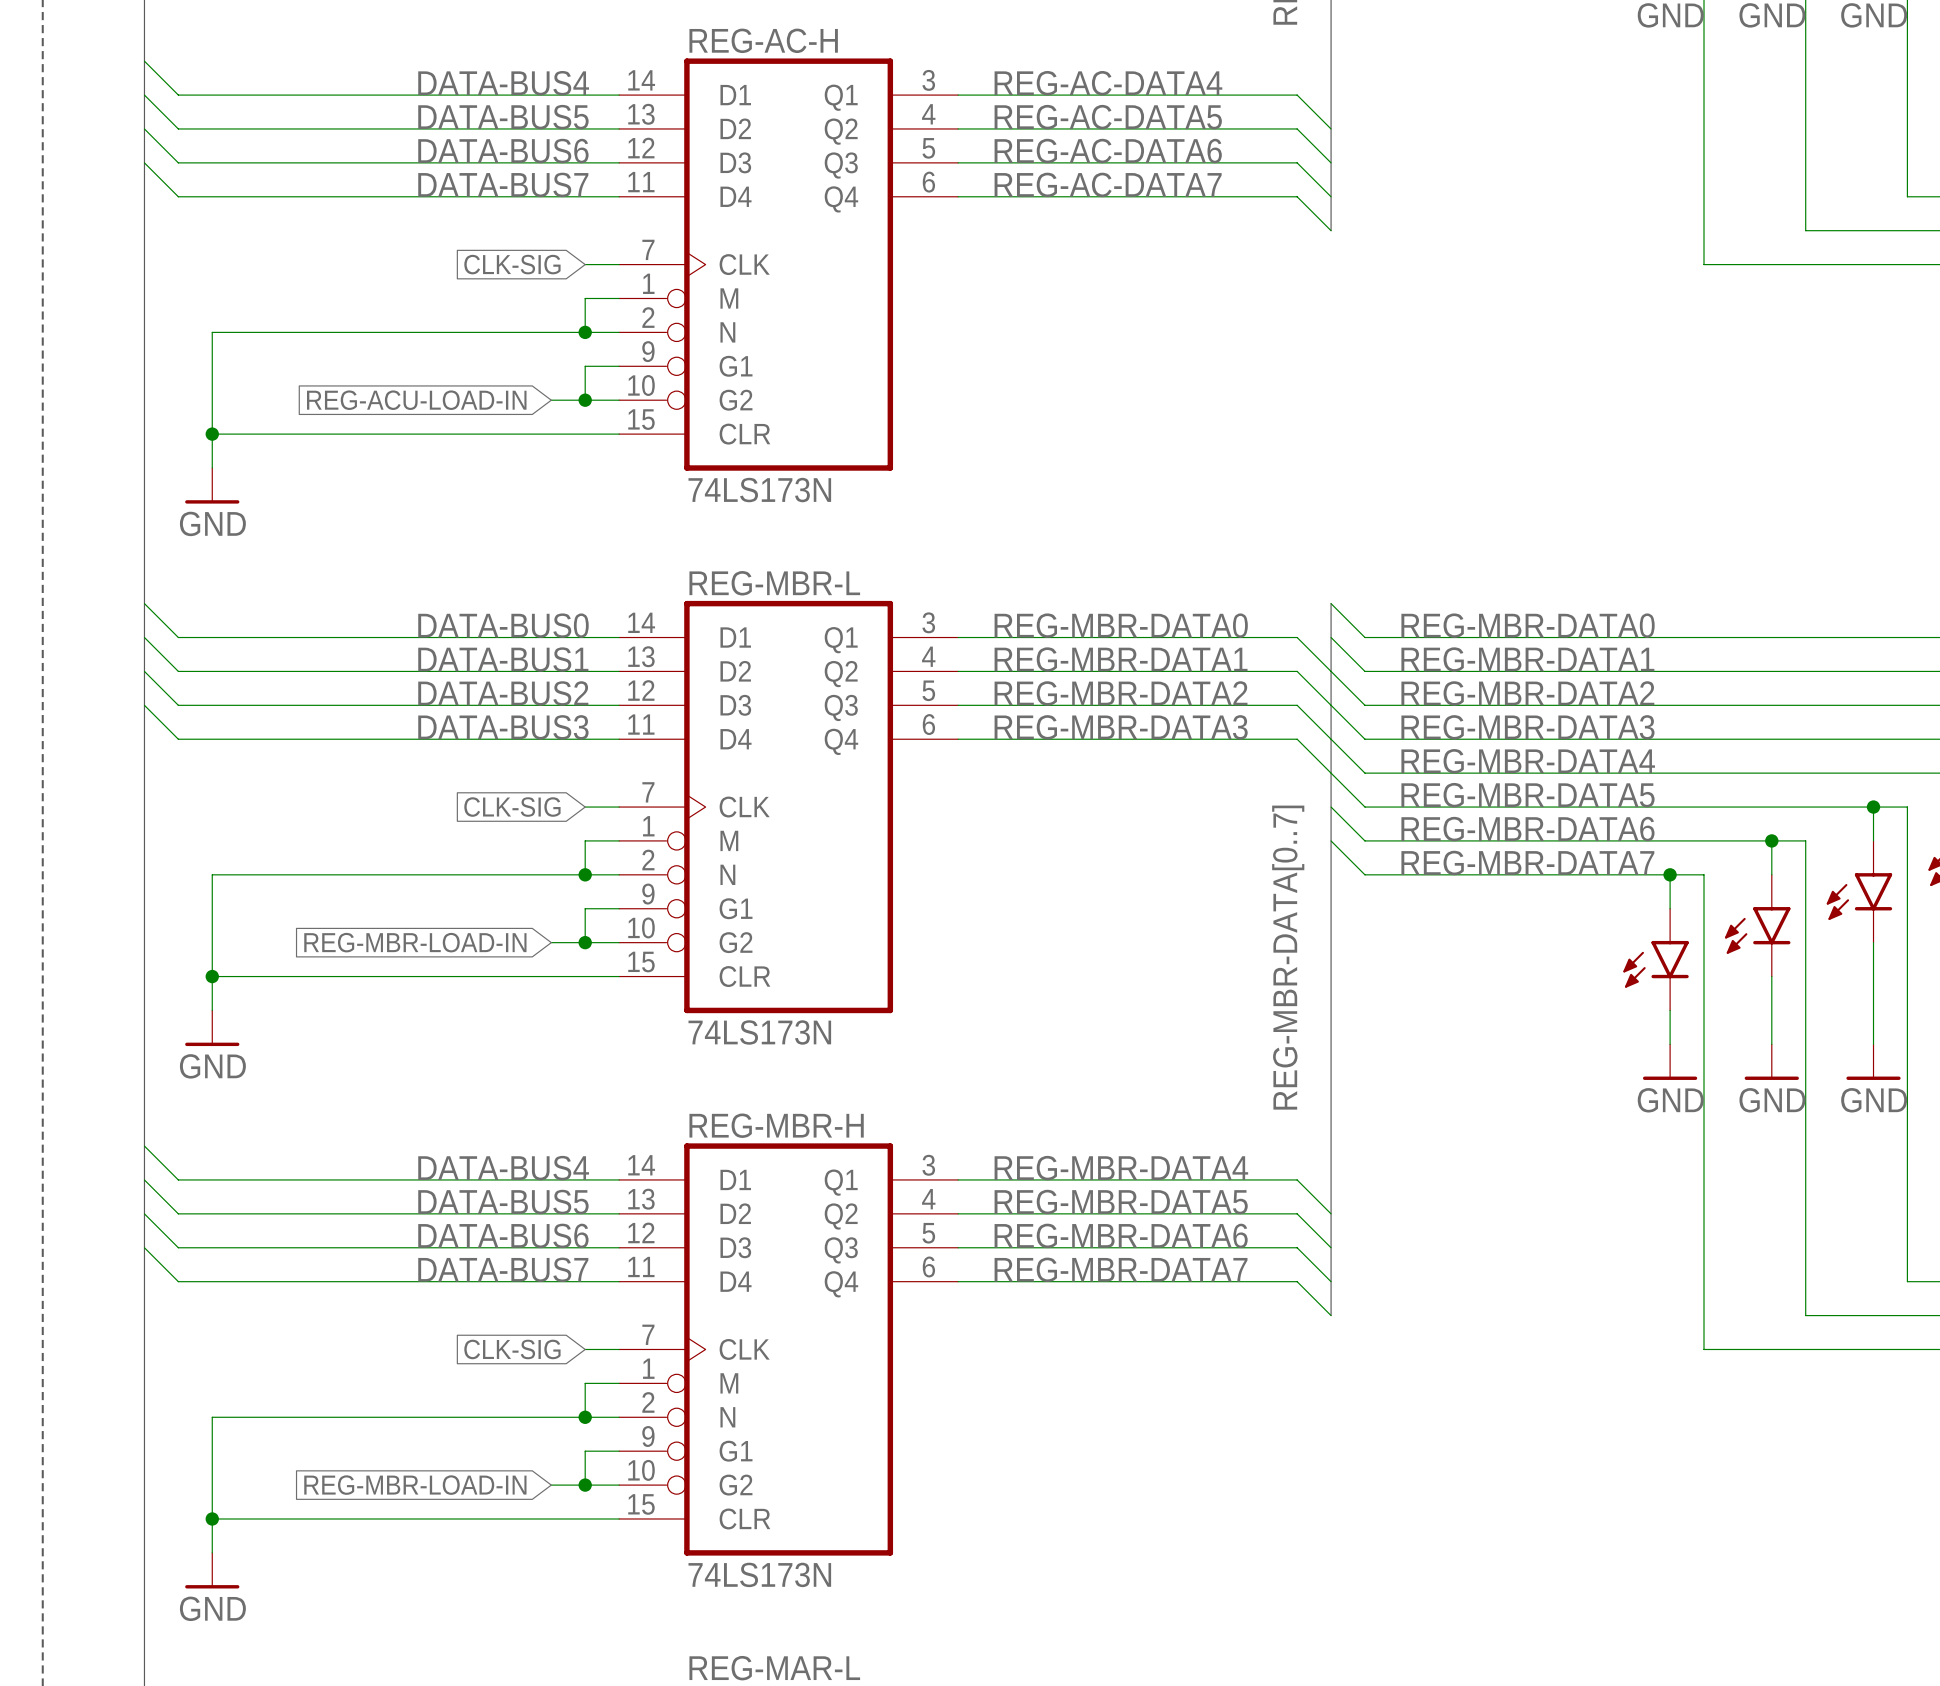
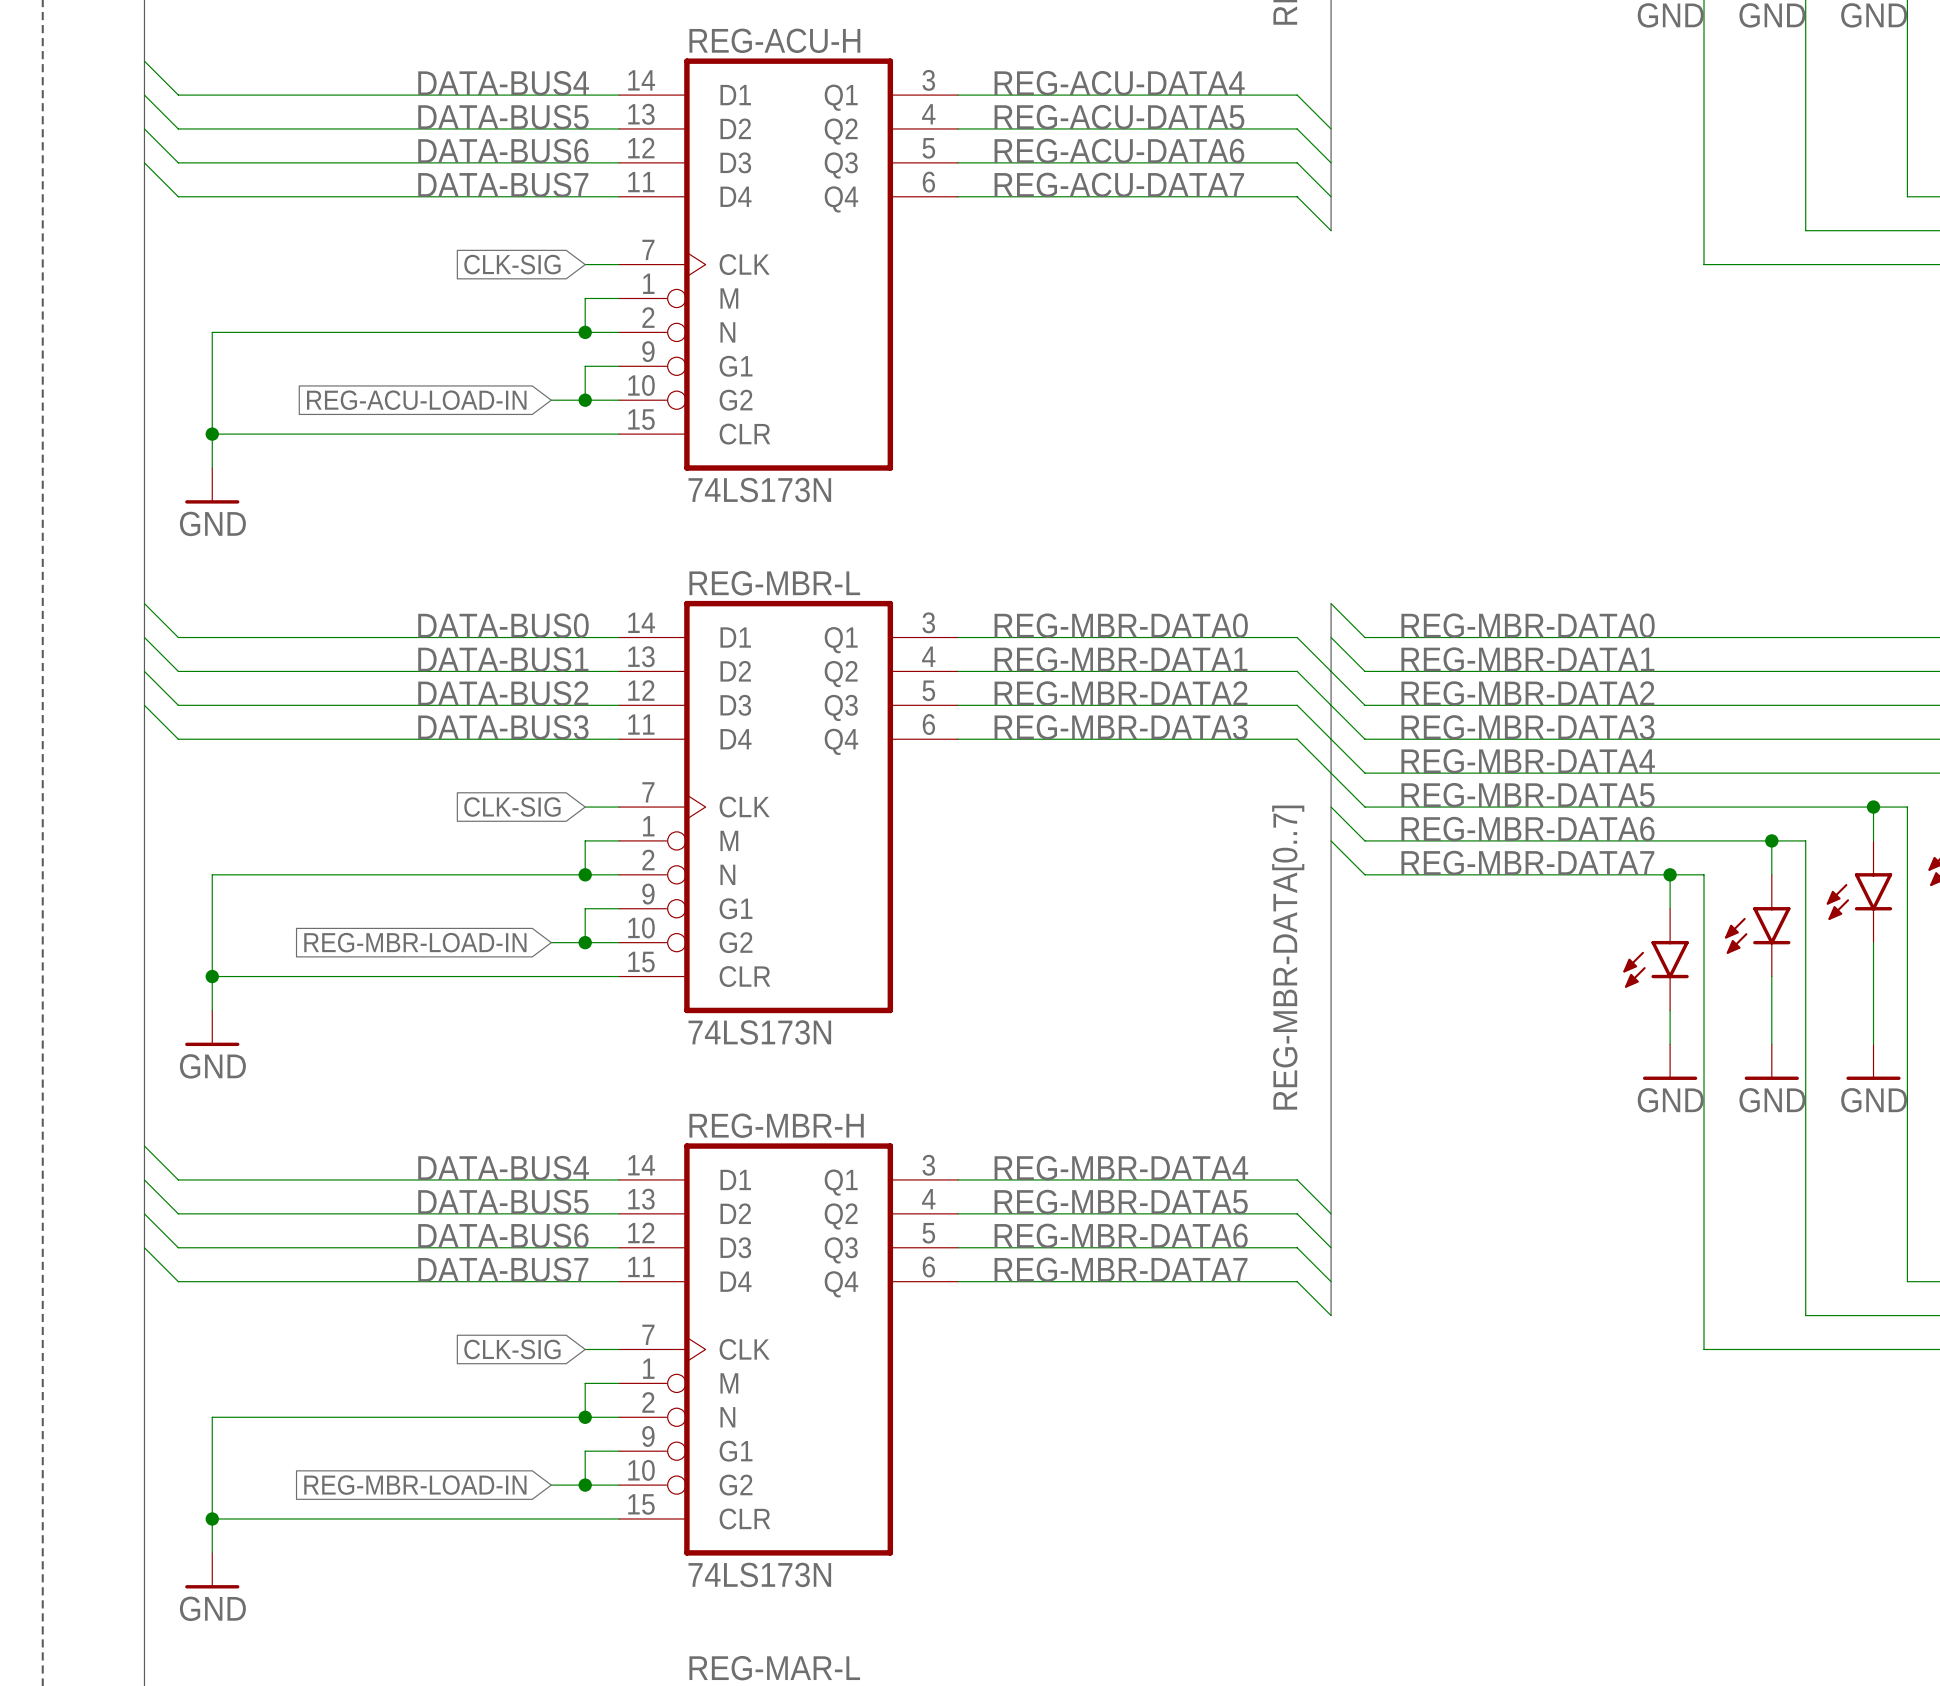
REG-AC-H name: REG-AC-H (763, 40) -> REG-ACU-H (774, 40)
label: REG-AC-DATA4 (1108, 83) -> REG-ACU-DATA4 (1119, 83)
label: REG-AC-DATA5 (1108, 117) -> REG-ACU-DATA5 (1119, 117)
label: REG-AC-DATA6 (1108, 151) -> REG-ACU-DATA6 (1119, 151)
label: REG-AC-DATA7 (1108, 184) -> REG-ACU-DATA7 (1119, 184)

